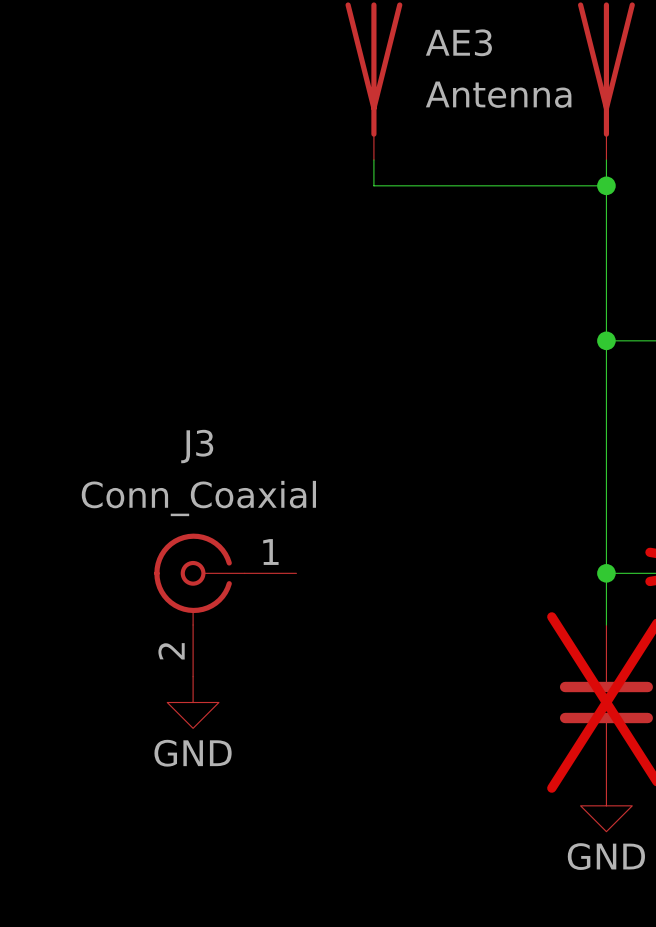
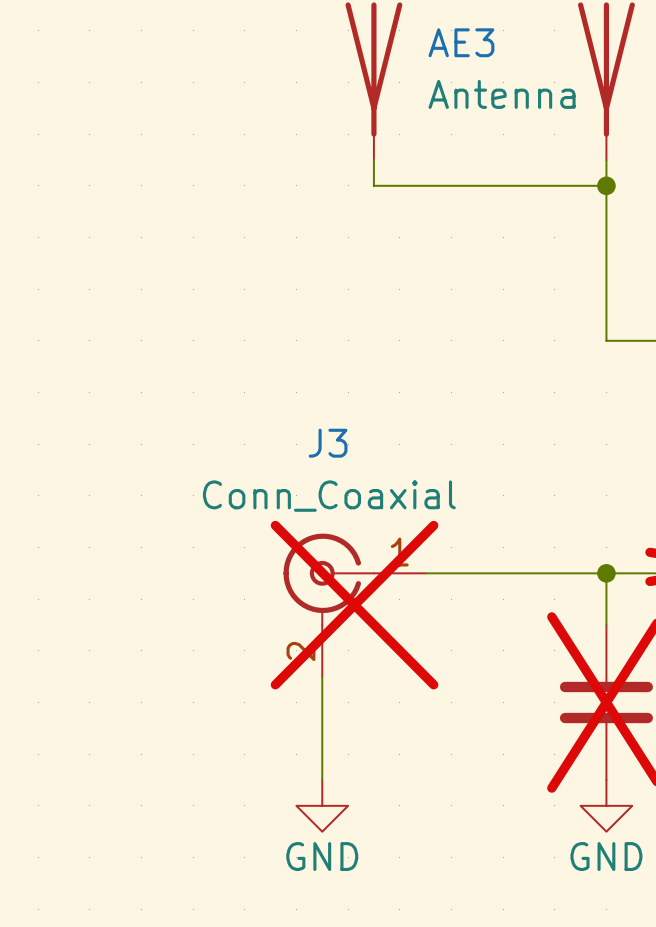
wire: (606, 340) (606, 573) -> (425, 573) (606, 573)
junction: (606, 340) -> none
J3 position: (225, 605) -> (354, 605)
J3 do-not-place cross: none -> (354, 605)
wire: none -> (322, 676) (322, 780)
power symbol position: GND (193, 702) -> GND (322, 805)

